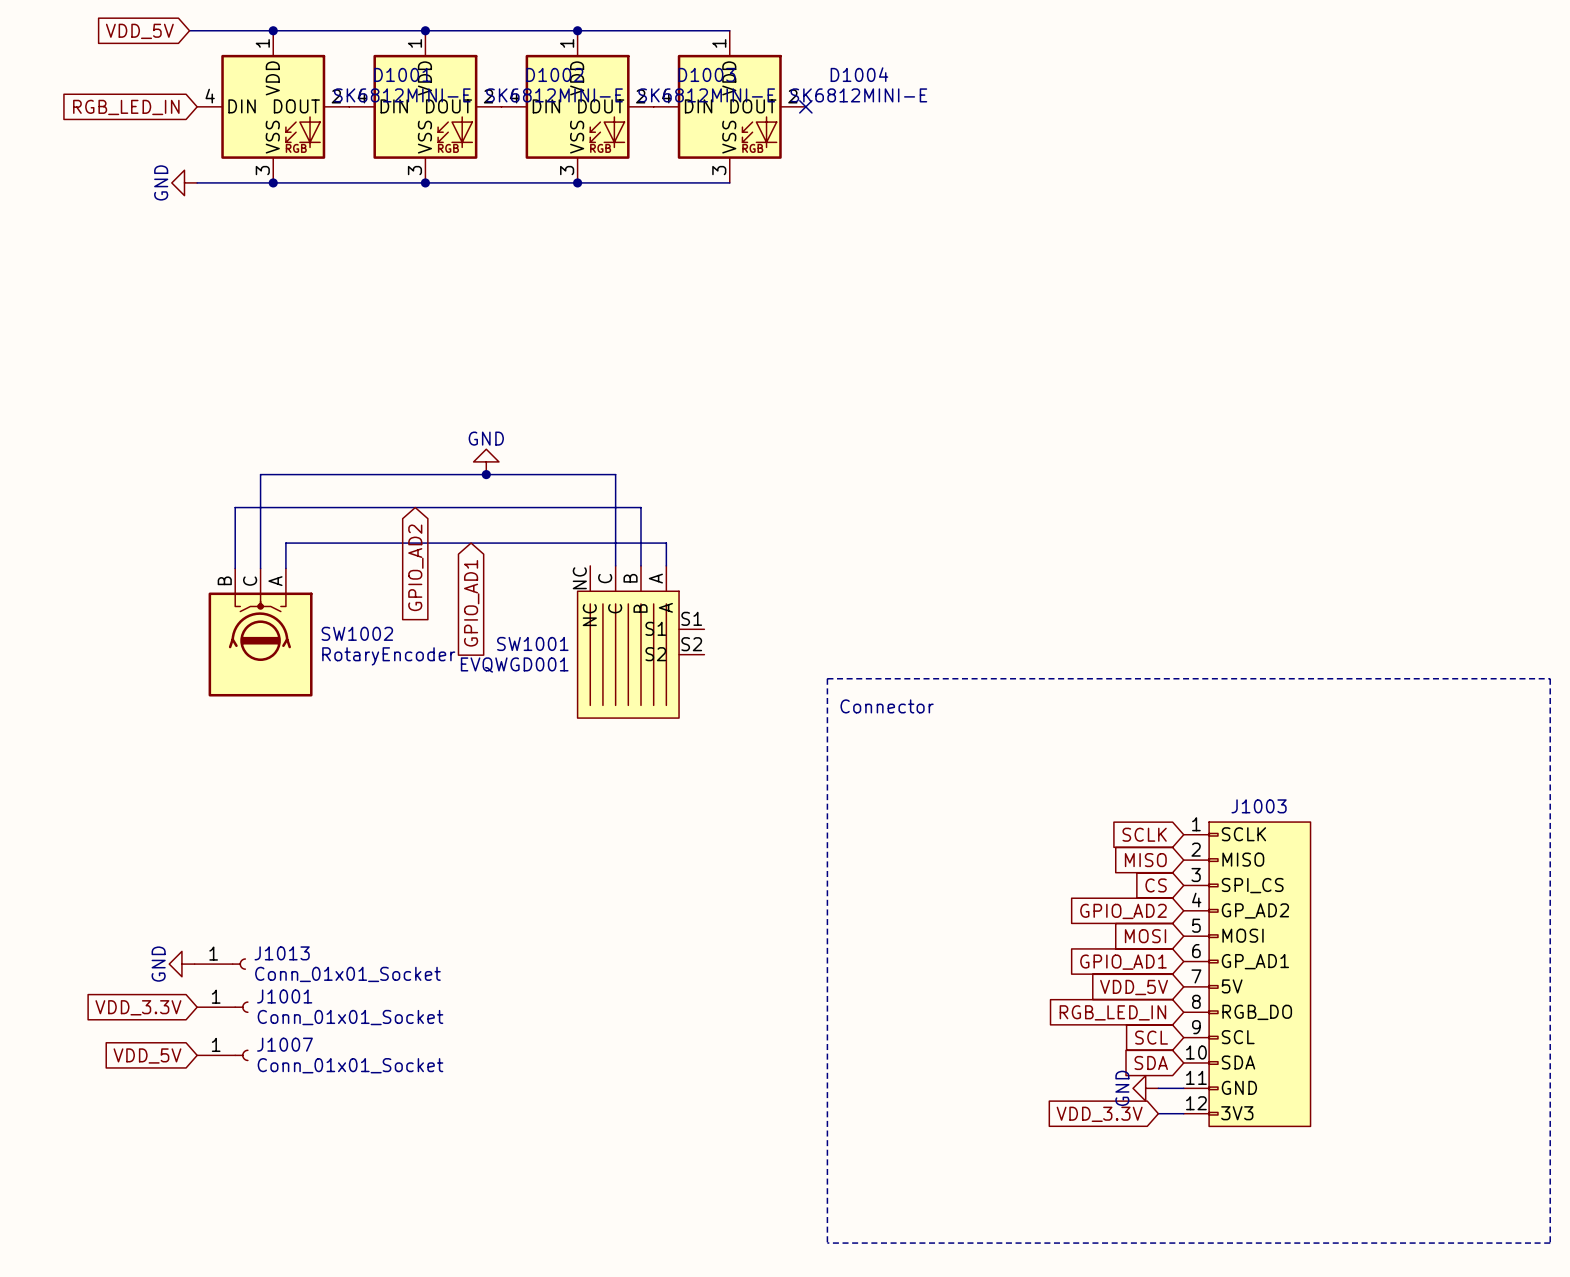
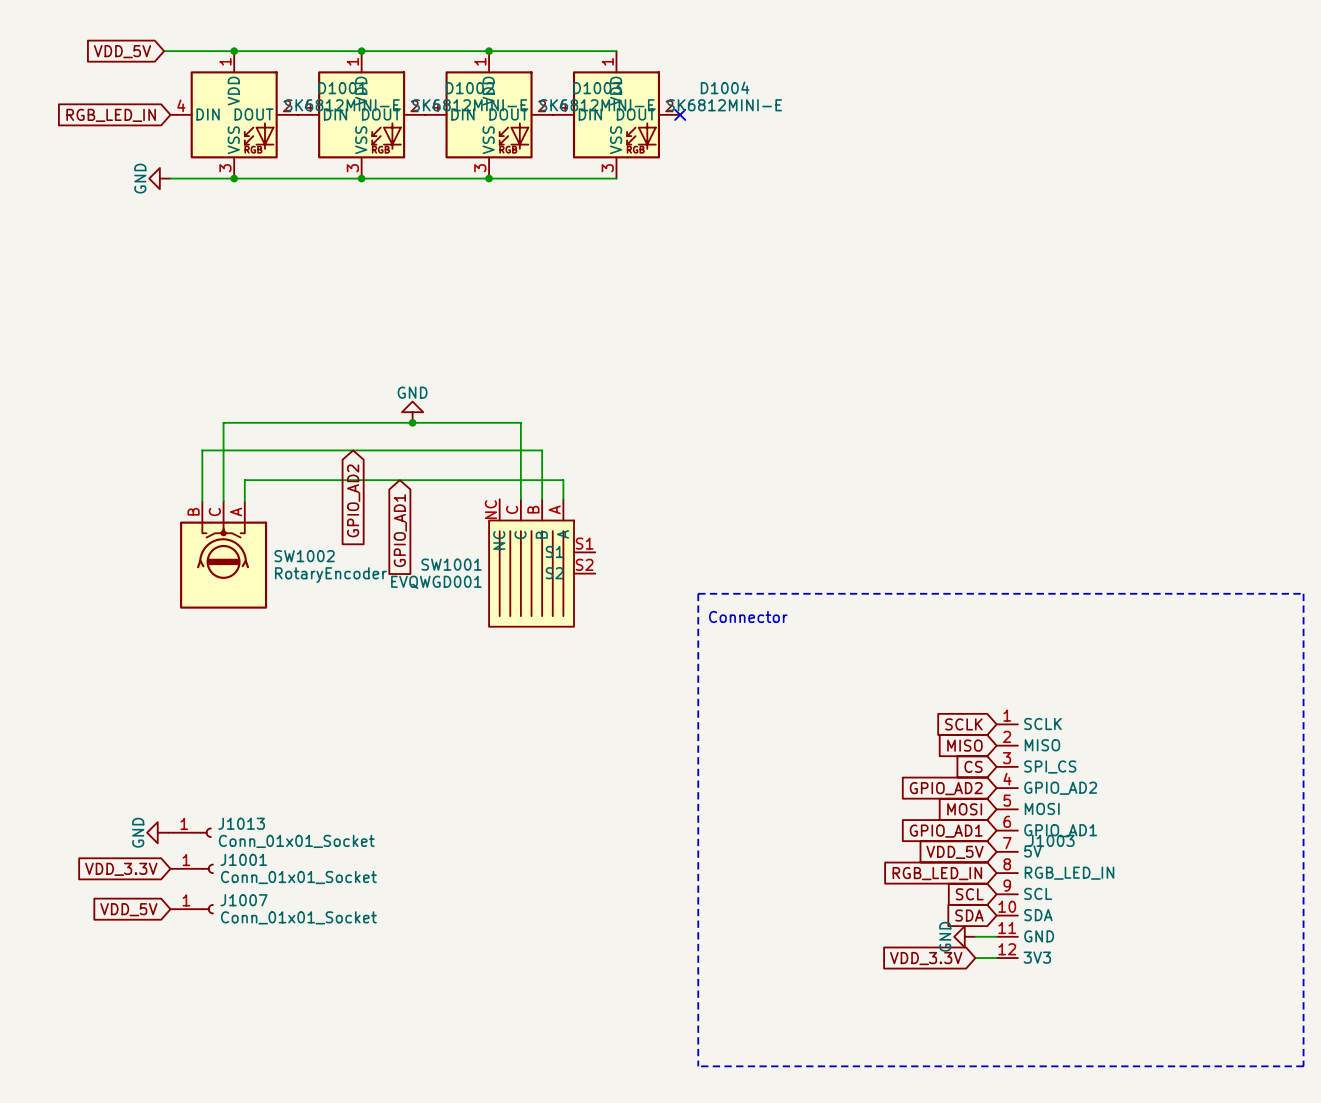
J1003 name position: J1003 (1259, 806) -> J1003 (1051, 840)
J1003 symbol: [1183, 822, 1311, 1127] -> [996, 724, 1018, 959]

